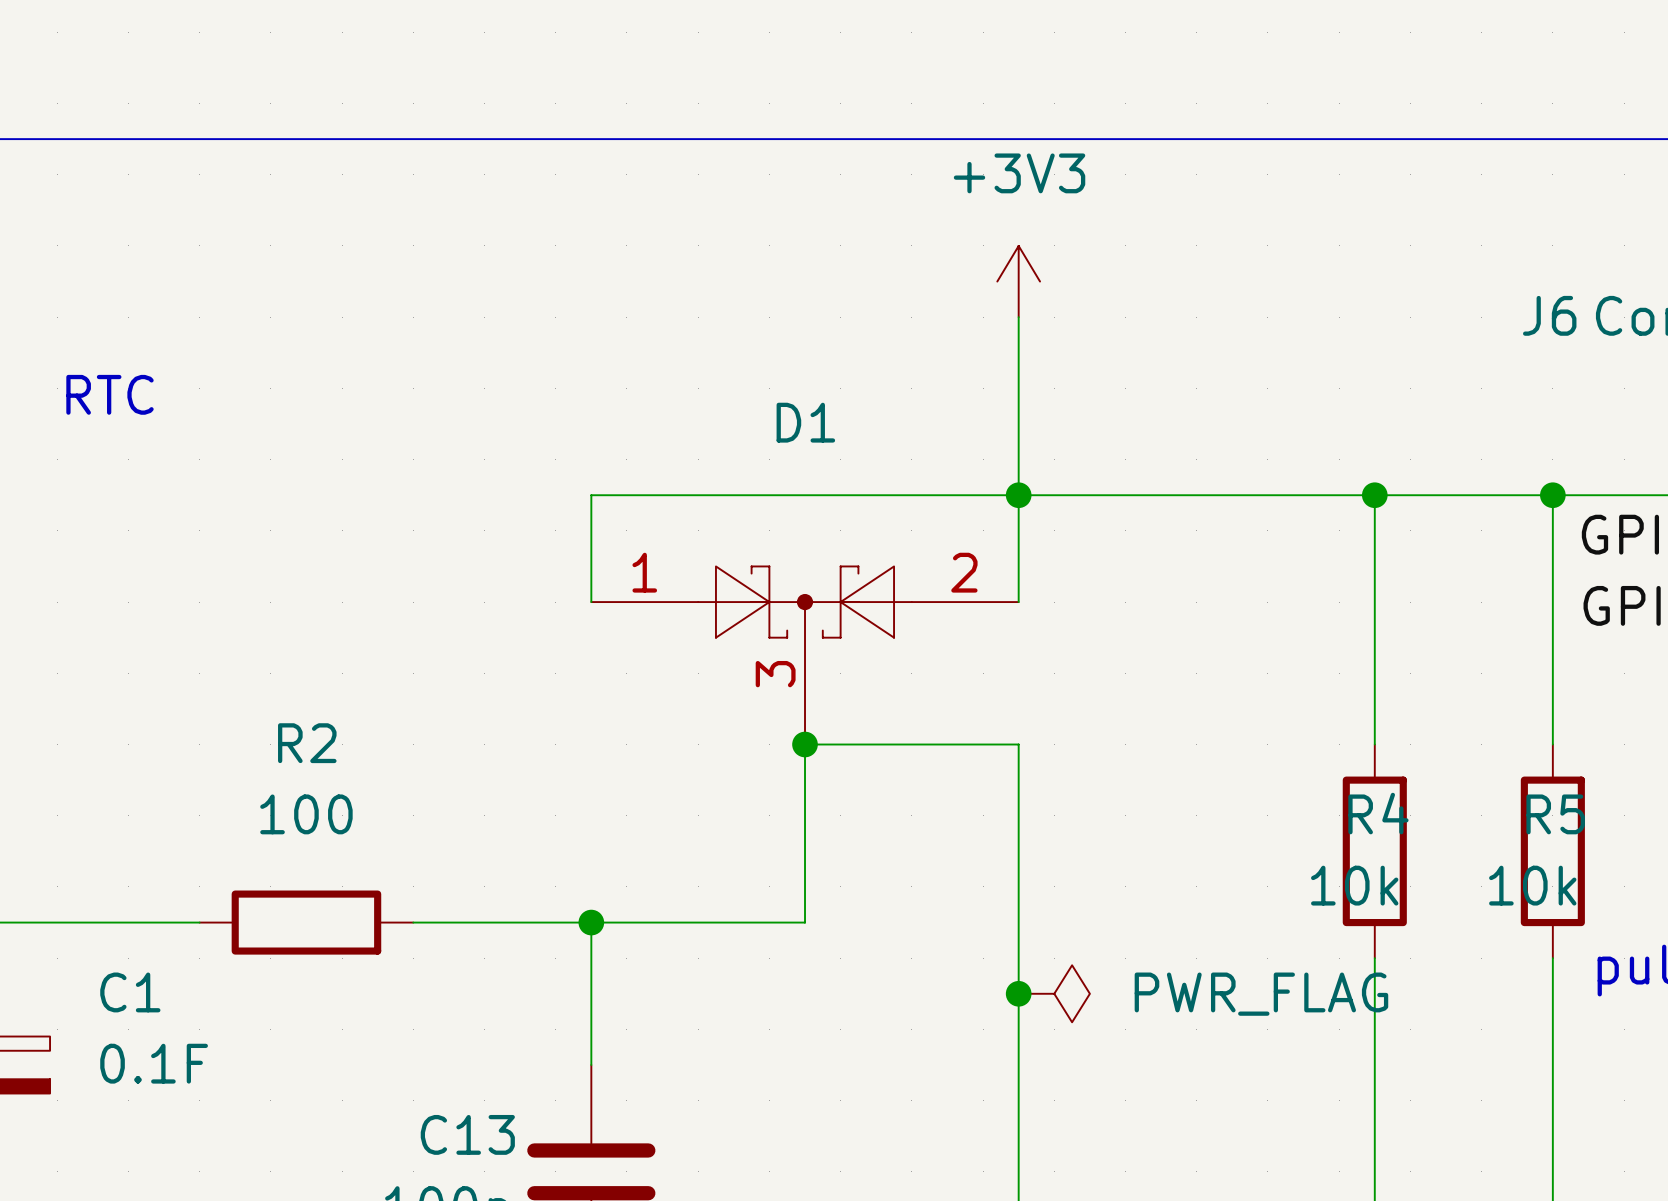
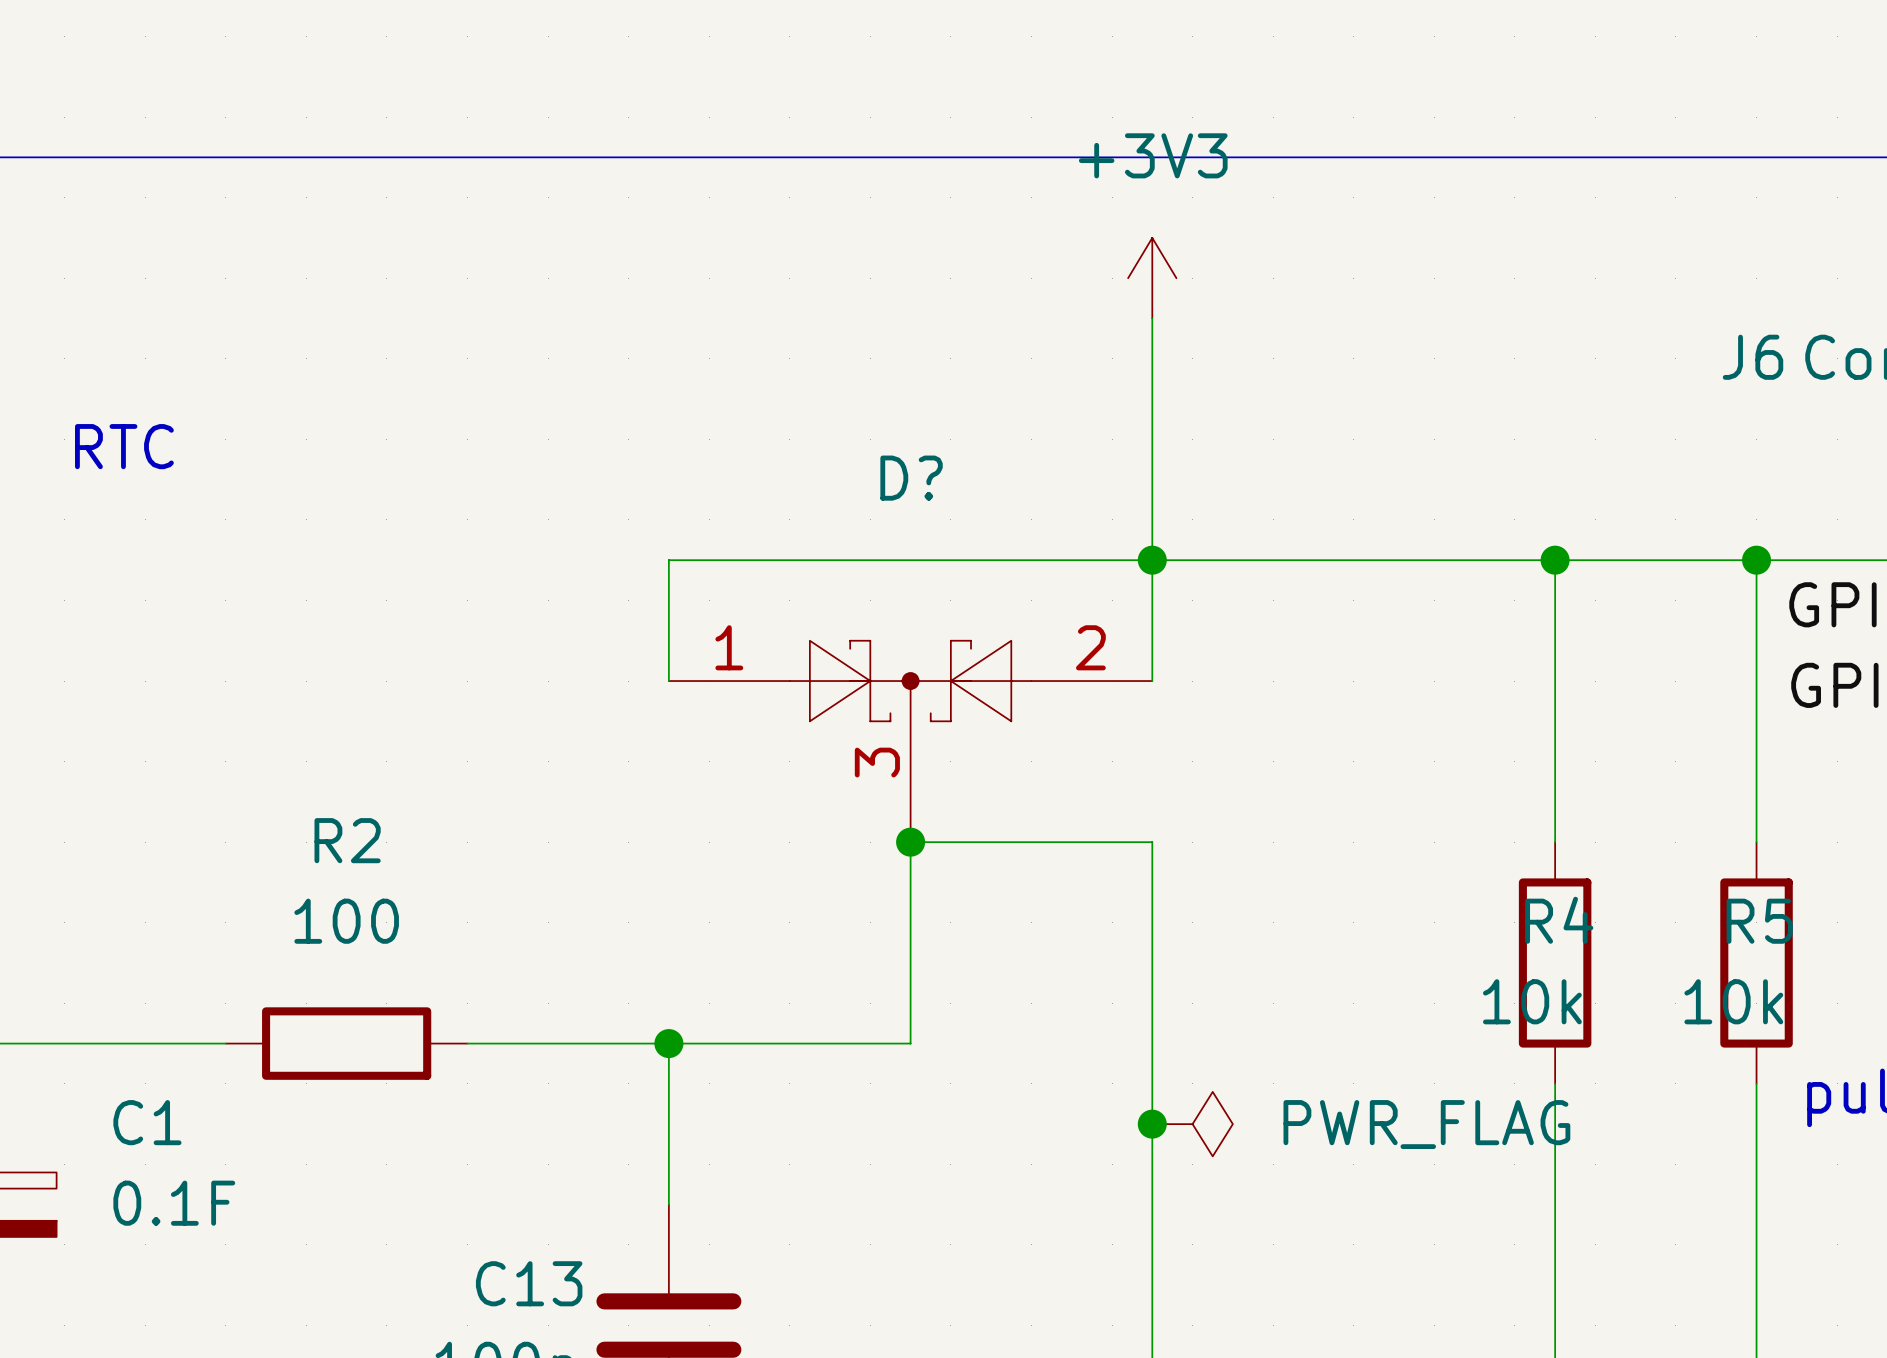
power symbol position: +3V3 (1018, 281) -> +3V3 (1152, 278)
D1 name: D1 (805, 422) -> D? (911, 478)

